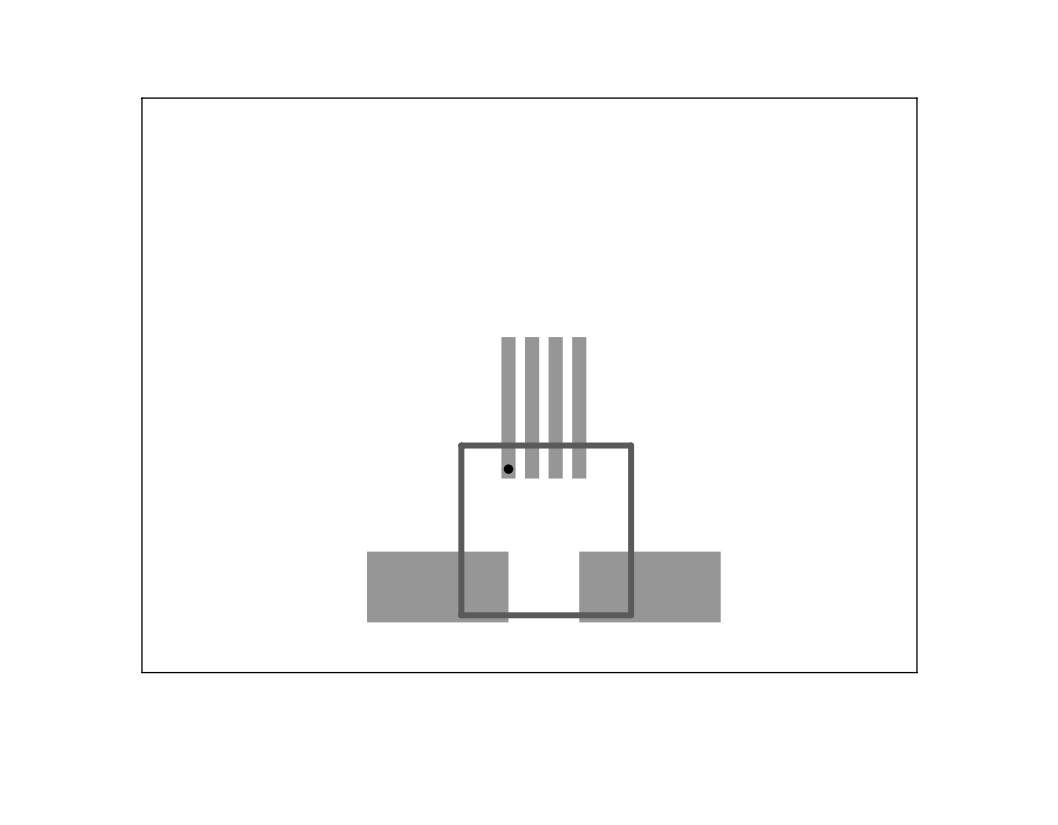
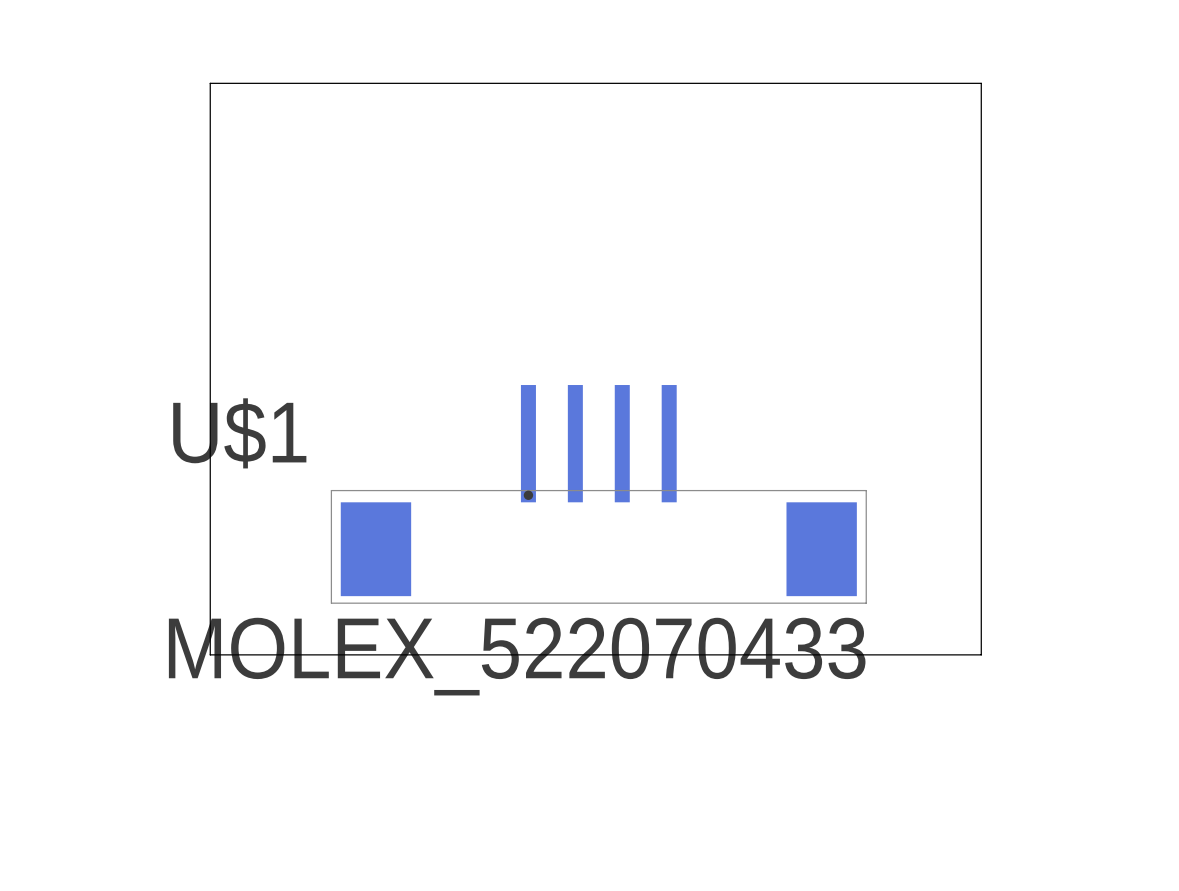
part: (543, 479) -> none
U$1: none -> MOLEX_522070433 (598, 494)

